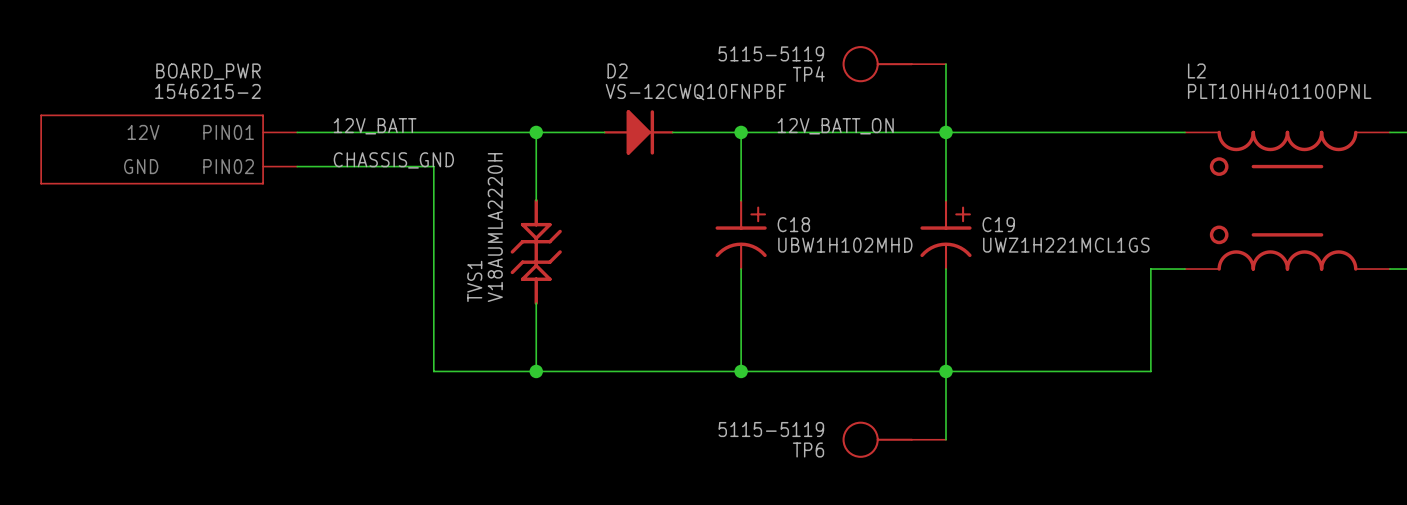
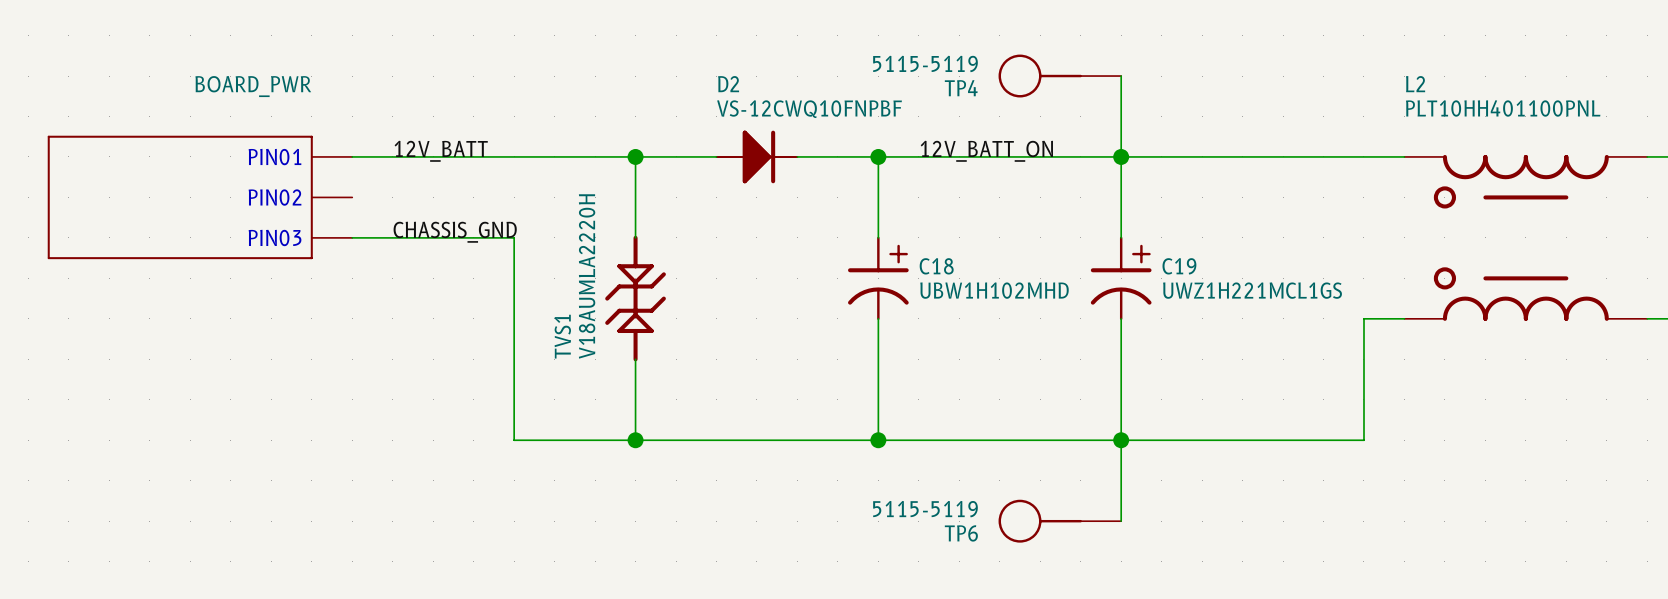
BOARD_PWR: 1546215-2 (168, 149) -> none
label position: CHASSIS_GND (393, 160) -> CHASSIS_GND (455, 232)
BOARD_PWR: none -> (200, 197)
wire: (297, 166) (433, 166) (433, 200) -> (352, 237) (514, 237)

